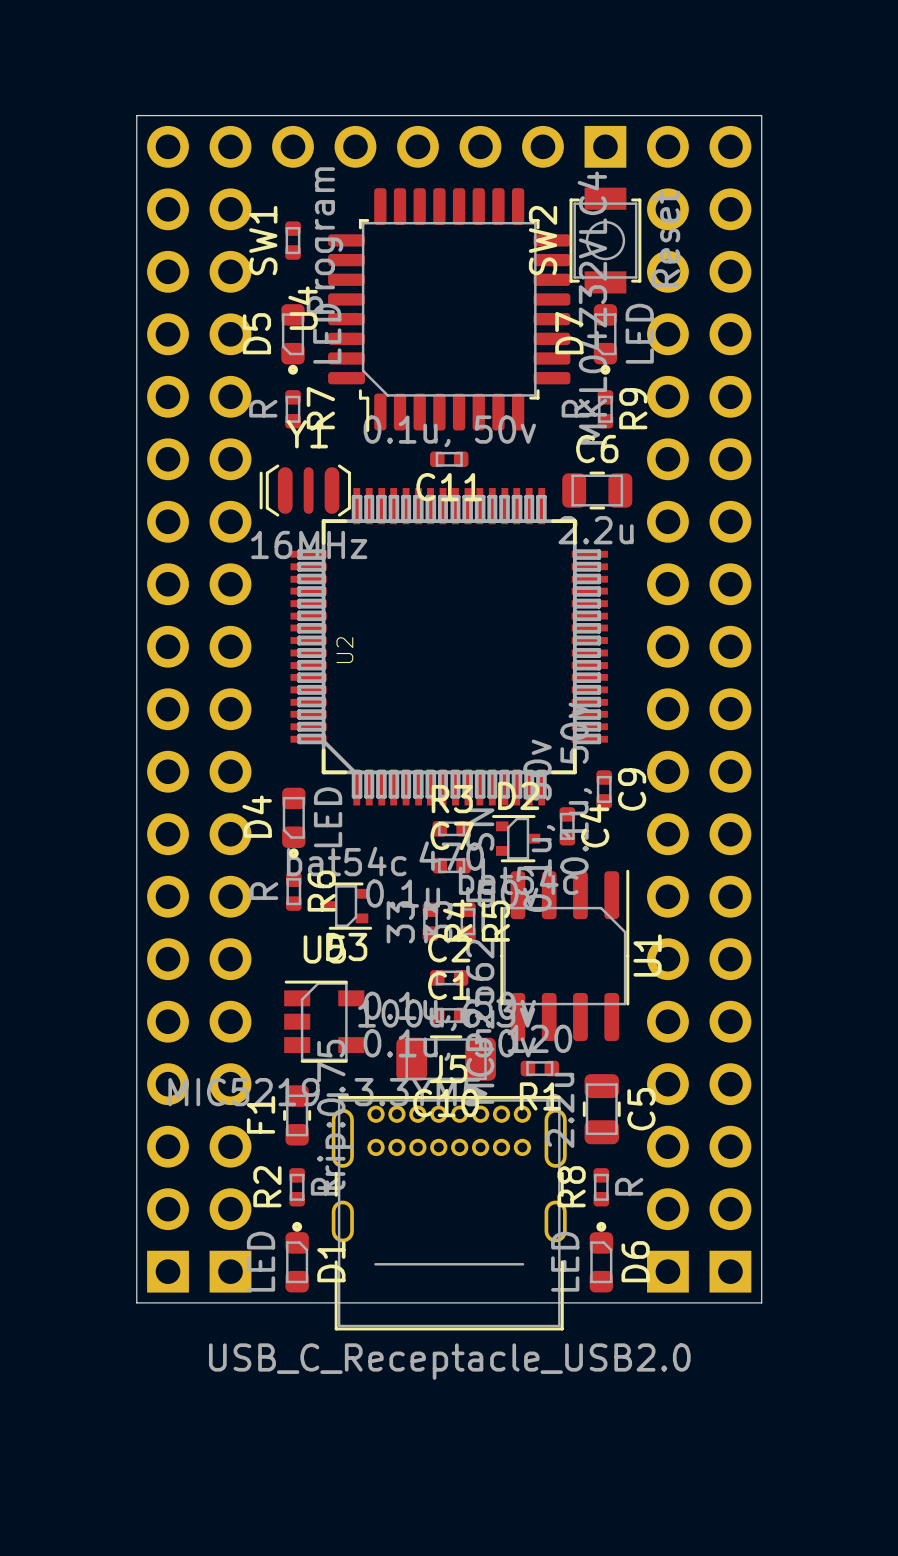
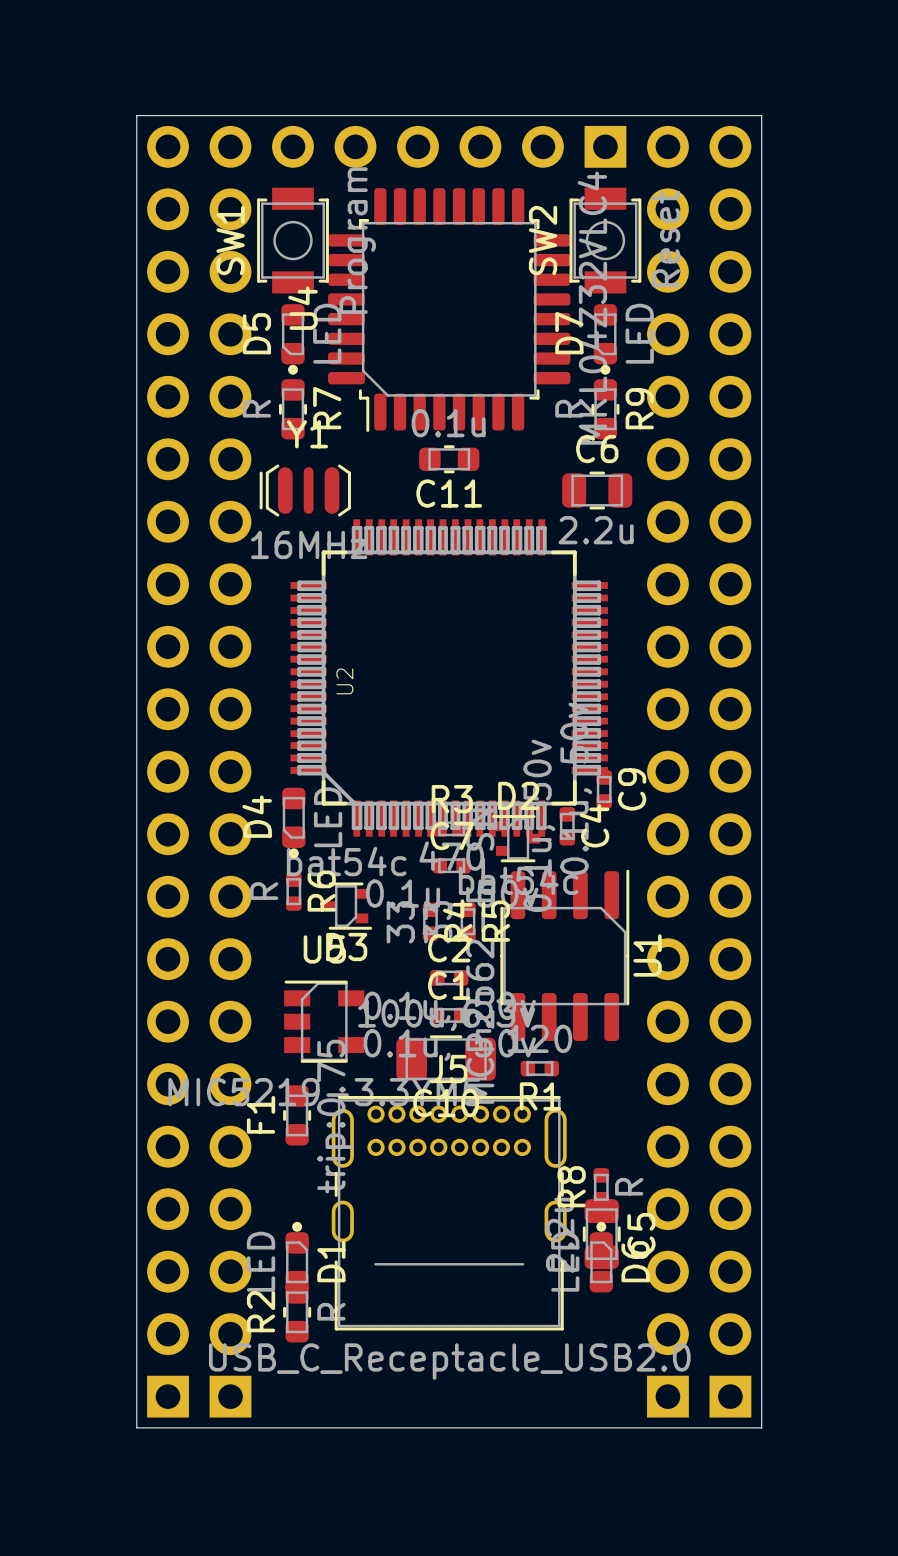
SW1 footprint: [285, 221, 301, 260] -> [257, 187, 329, 294]
R7 footprint: [285, 390, 301, 429] -> [278, 379, 308, 440]
R9 footprint: [597, 390, 614, 429] -> [591, 379, 620, 440]
C11 value: 0.1u, 50v (449, 431) -> 0.1u (448, 423)
C11 footprint: [430, 451, 469, 468] -> [419, 445, 480, 474]
U2 position: (449, 646) -> (449, 678)
part: (168, 709) -> none
part: (230, 709) -> none
part: (667, 709) -> none
part: (730, 709) -> none
part: none -> (168, 771)
part: none -> (230, 771)
part: none -> (667, 771)
part: none -> (730, 771)
C5 position: (601, 1109) -> (601, 1234)
R2 footprint: [289, 1168, 305, 1207] -> [283, 1282, 312, 1343]
board edge: (136, 1302) (761, 1302) -> (136, 1302) (136, 1427) (761, 1427) (761, 1302)

